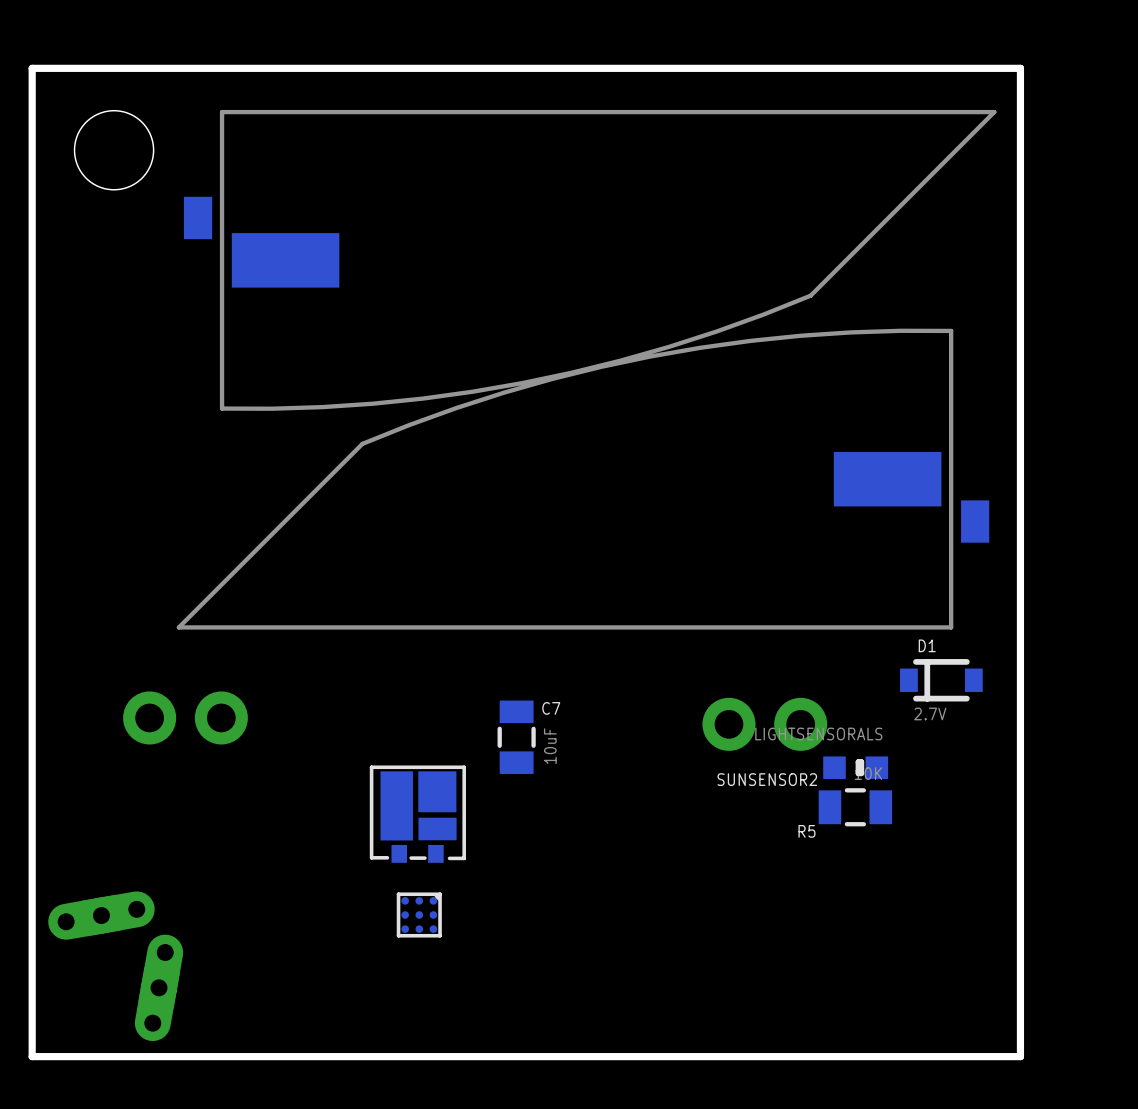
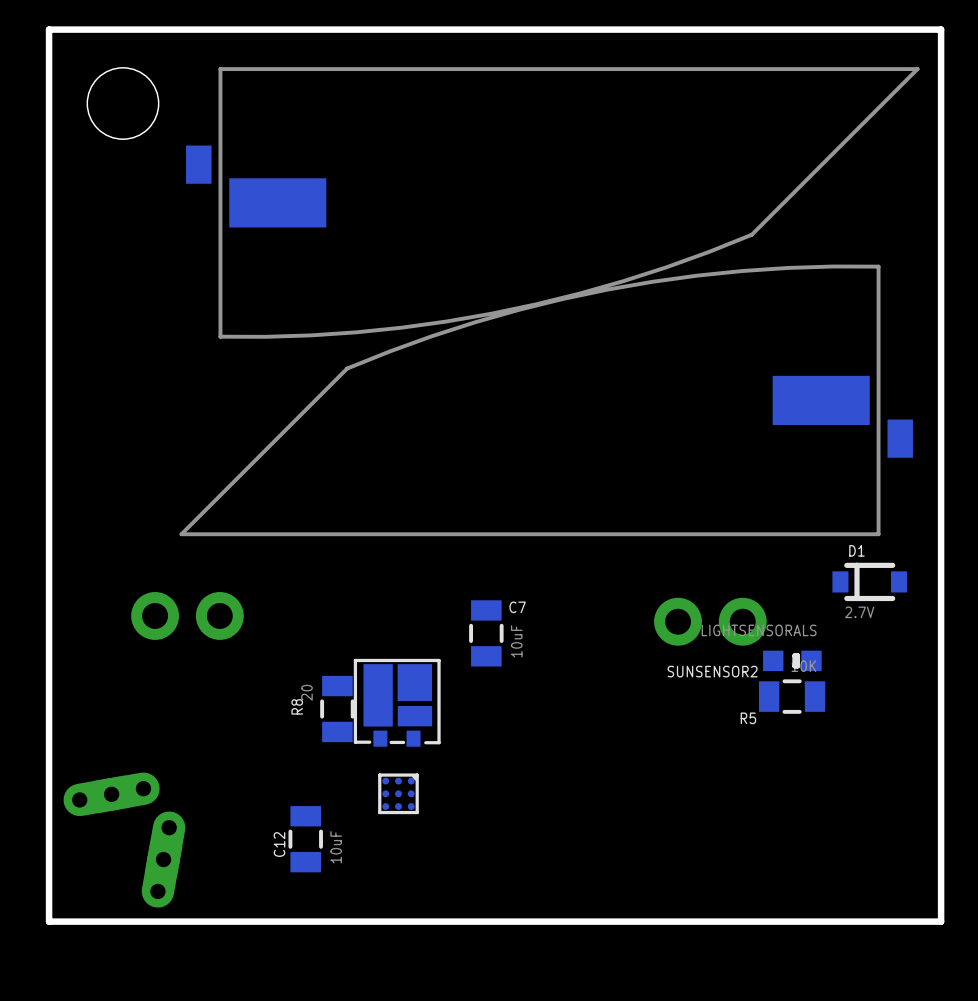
R8: none -> 20 (337, 708)
C12: none -> 10uF (305, 839)

